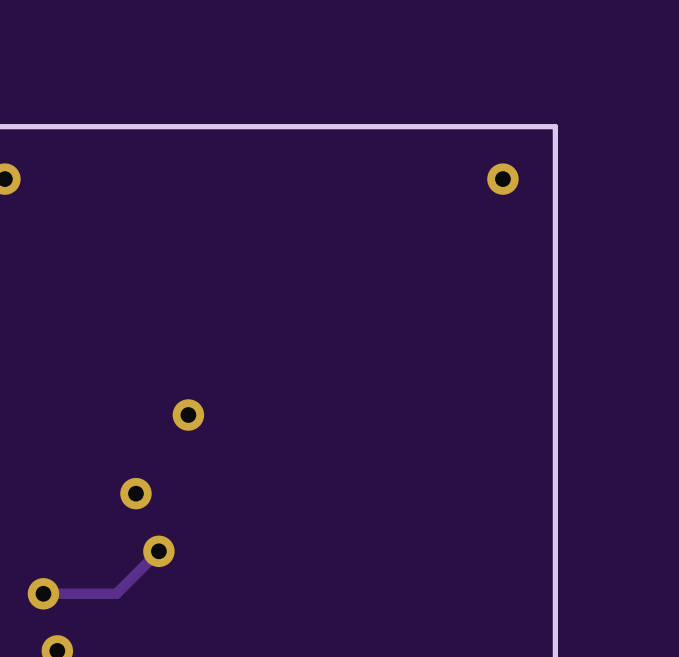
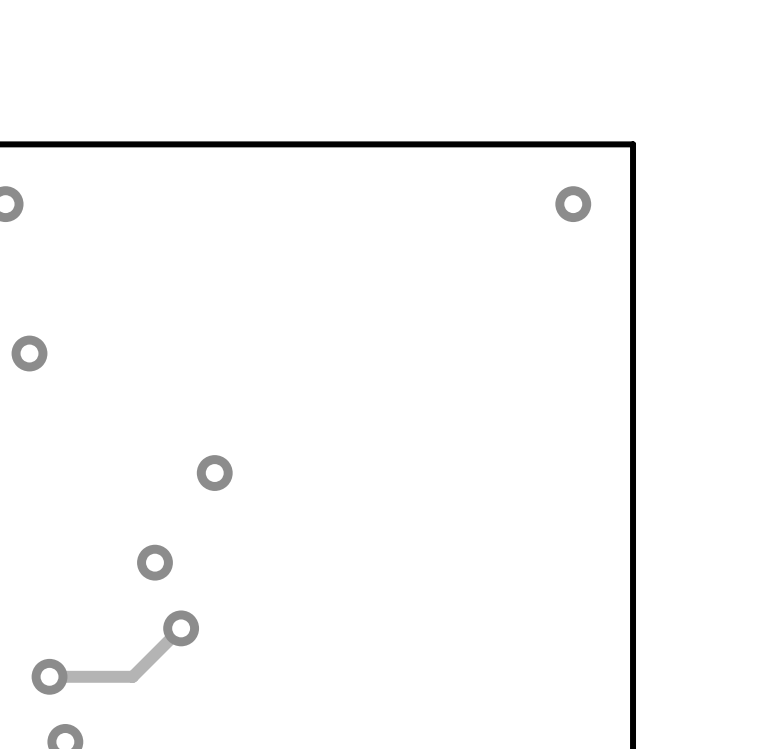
via: none -> (29, 353)

